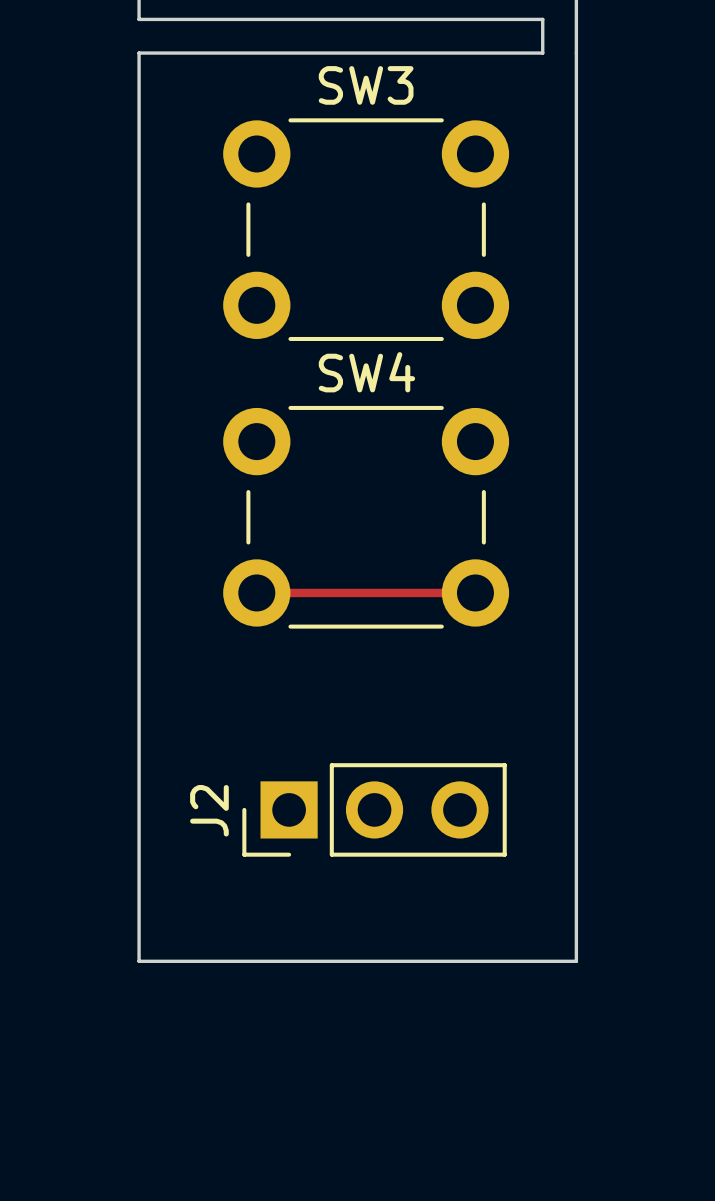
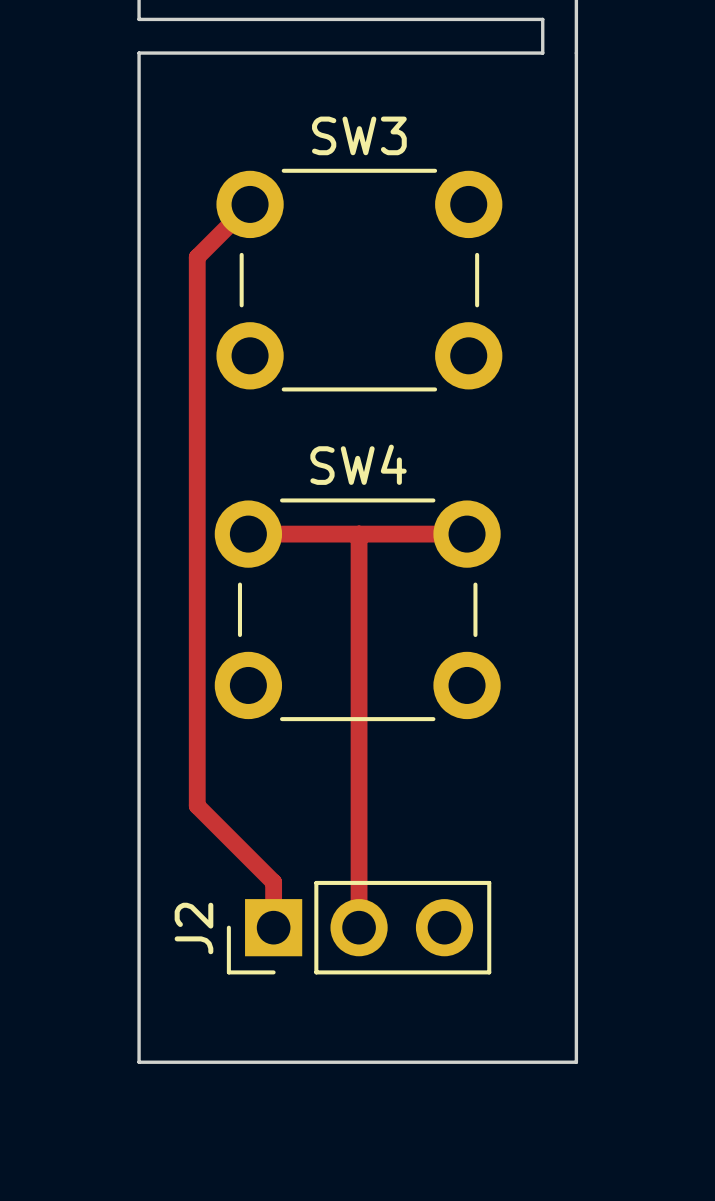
track: none -> (250, 204) (197, 257) (197, 805) (273, 882) (273, 927)
SW3 position: (366, 229) -> (359, 280)
SW4 position: (366, 517) -> (357, 609)
track: none -> (359, 534) (359, 927)
track: (256, 592) (475, 592) -> (248, 534) (467, 534)
J2 position: (374, 809) -> (359, 927)
board edge: (139, 961) (576, 961) -> (139, 961) (139, 1062) (576, 1062) (576, 961)

